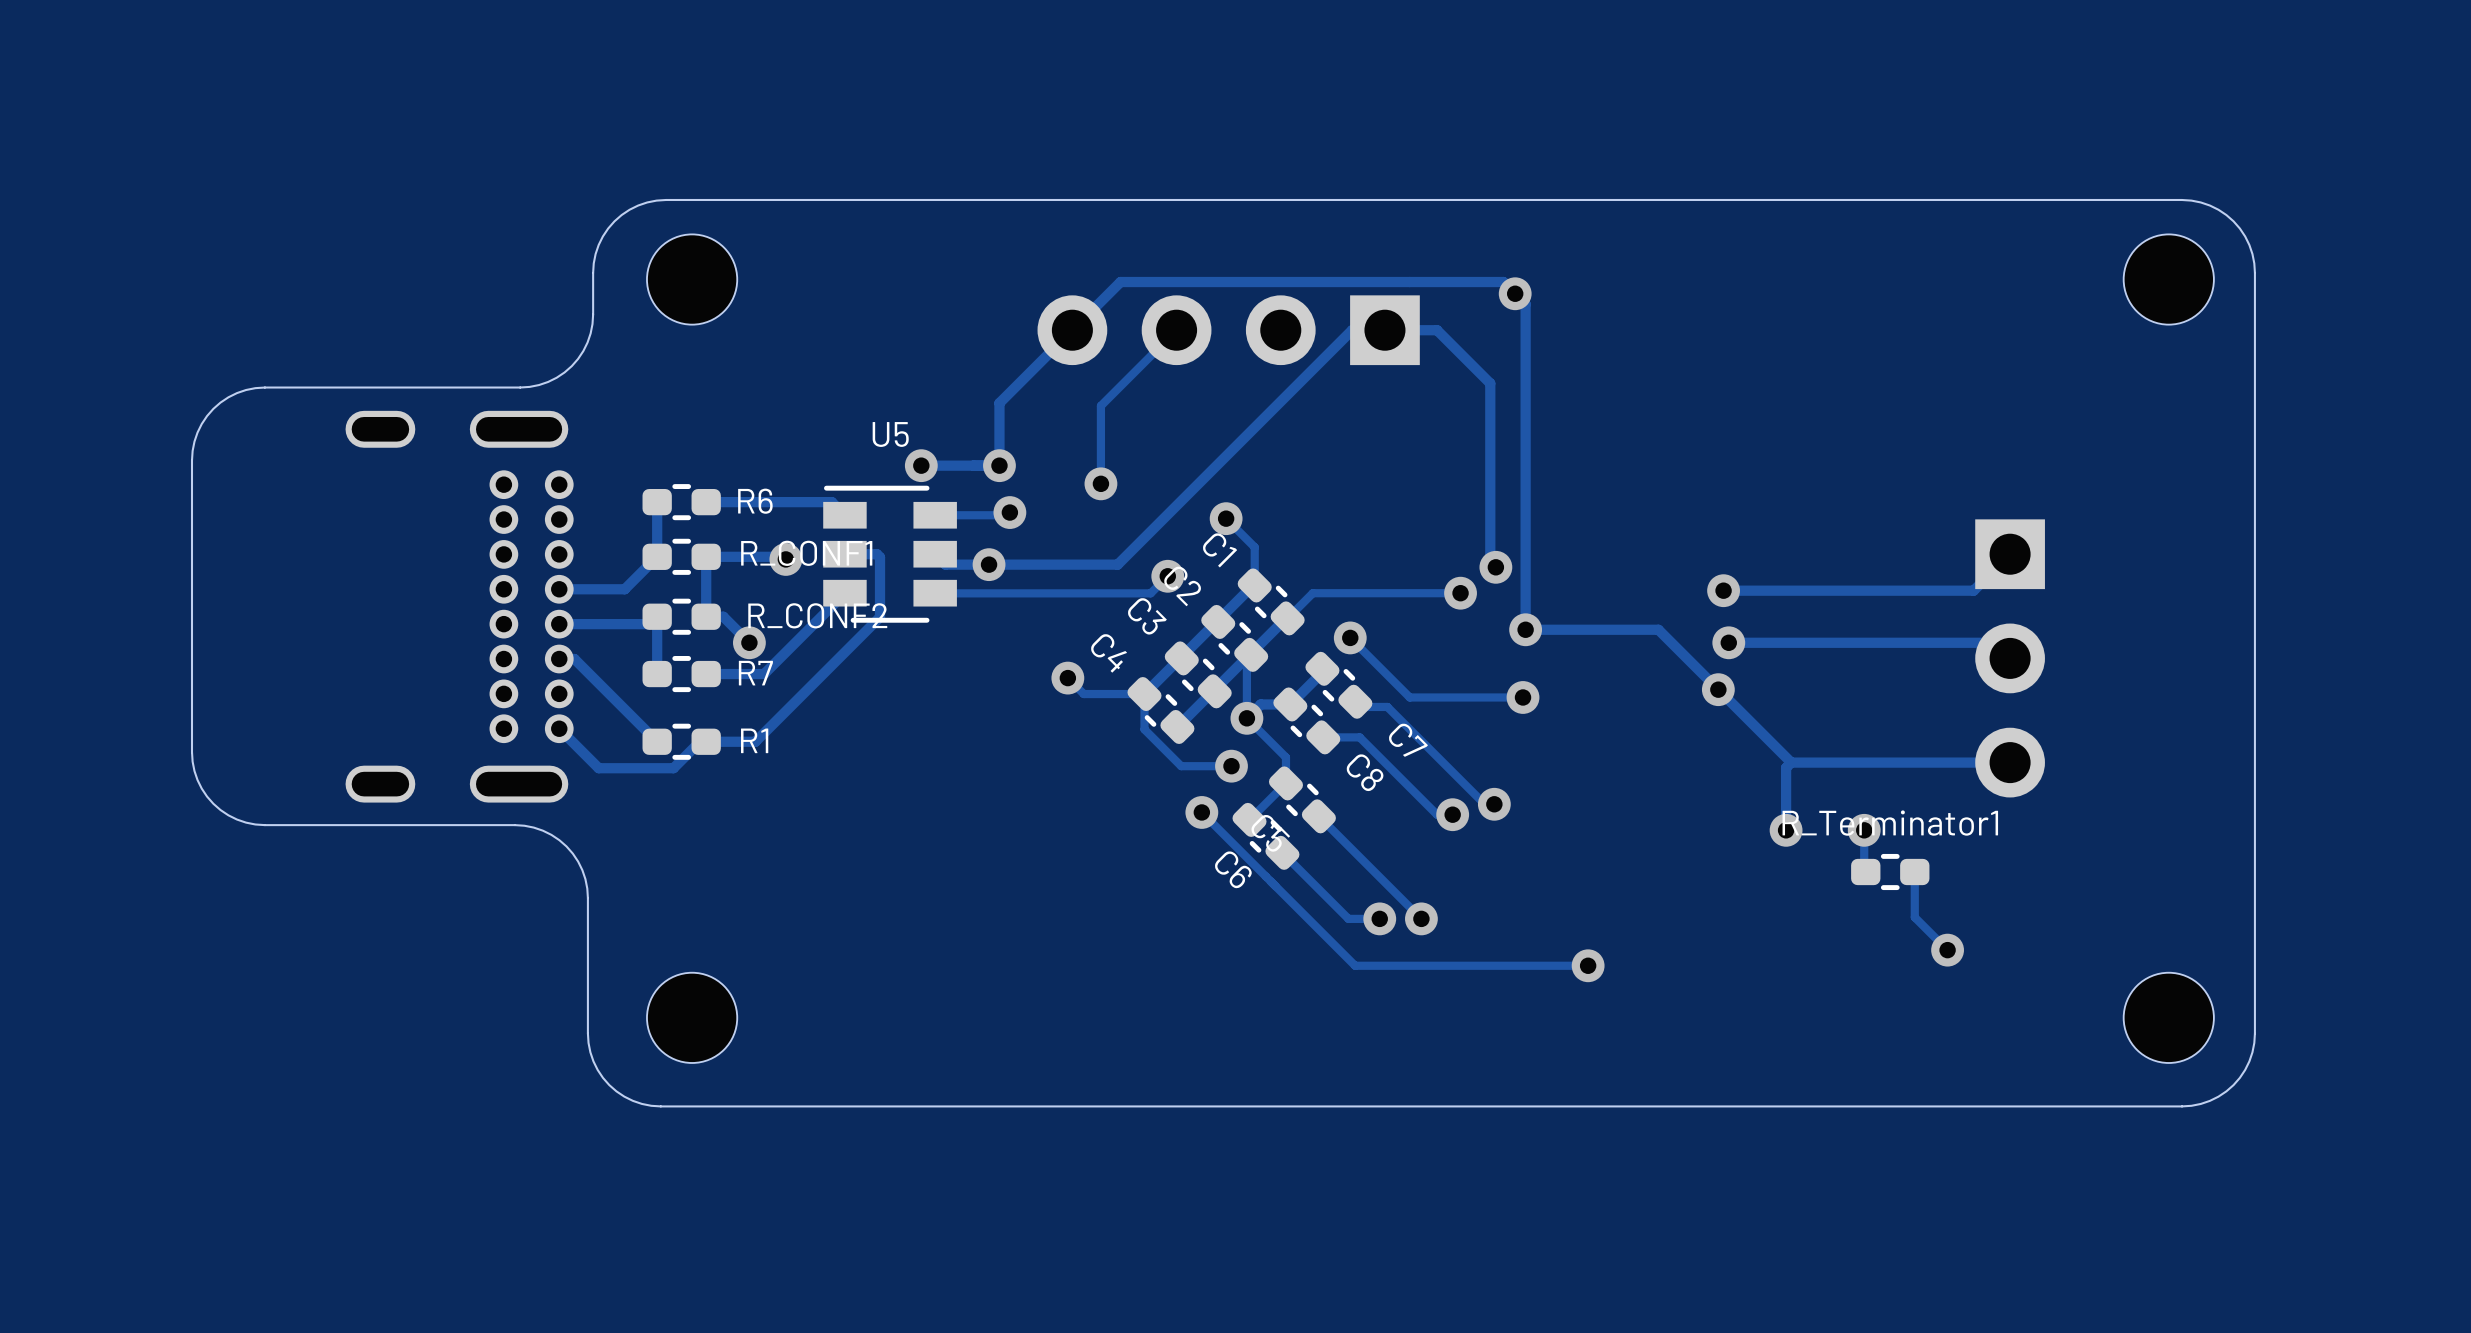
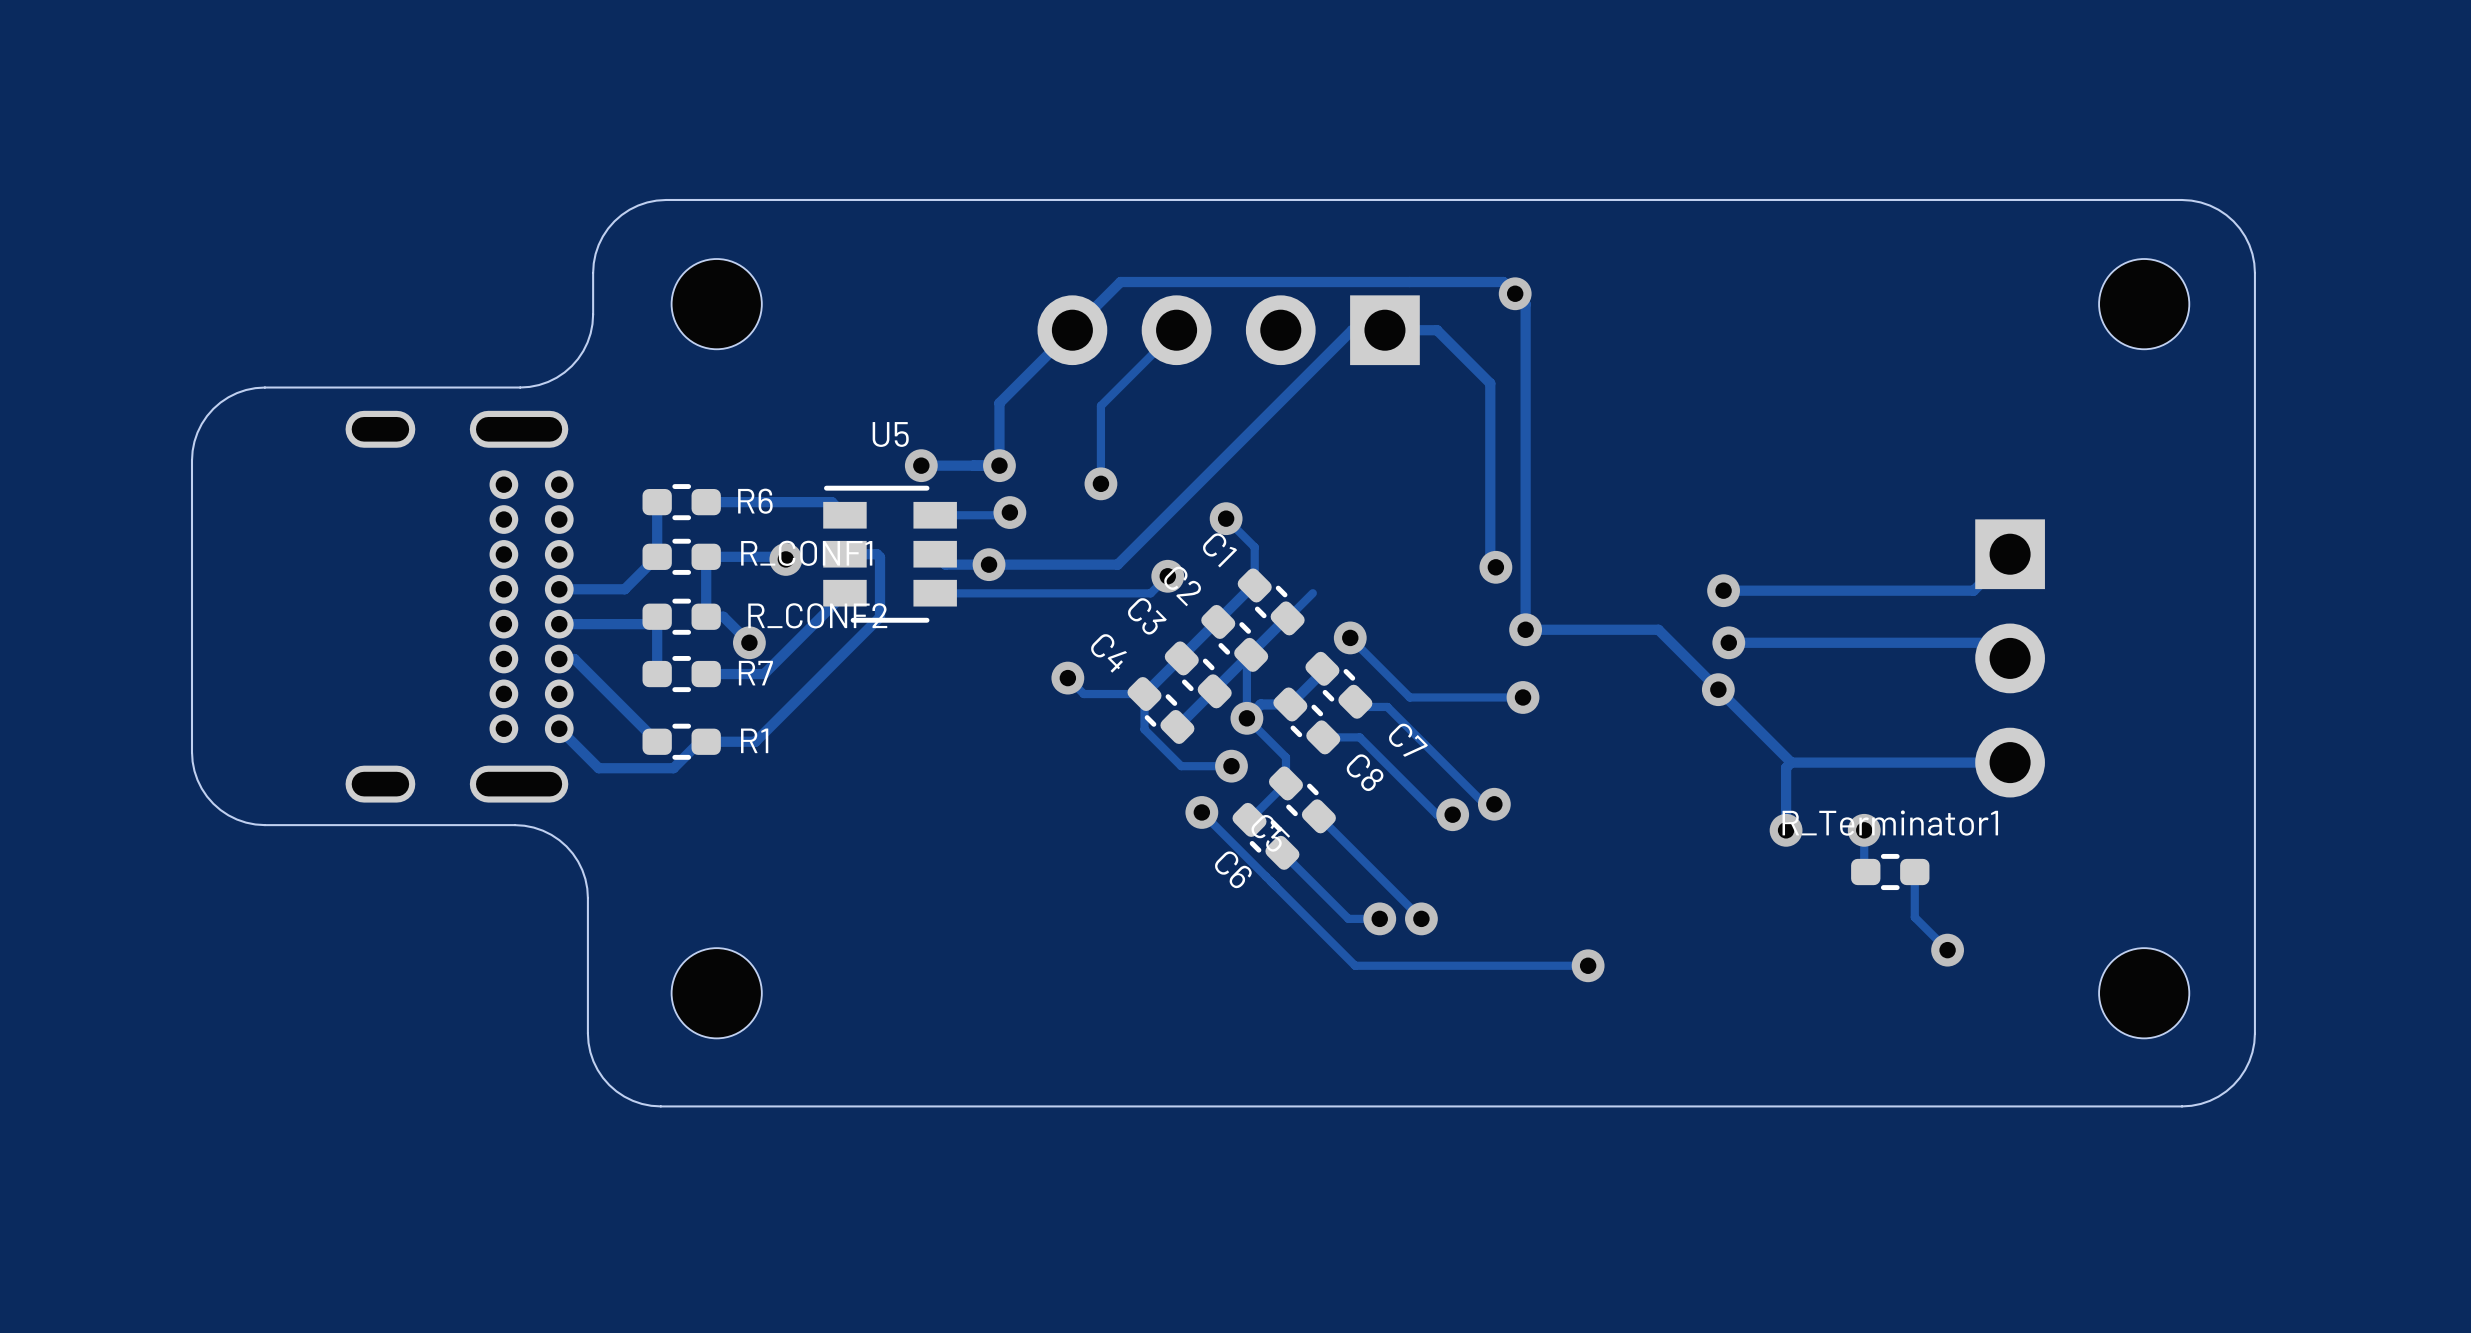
part position: (692, 279) -> (716, 304)
part position: (2168, 279) -> (2144, 304)
track: (1460, 593) (1312, 593) -> none
via: (1460, 593) -> none
part position: (692, 1017) -> (716, 993)
part position: (2168, 1017) -> (2144, 993)

